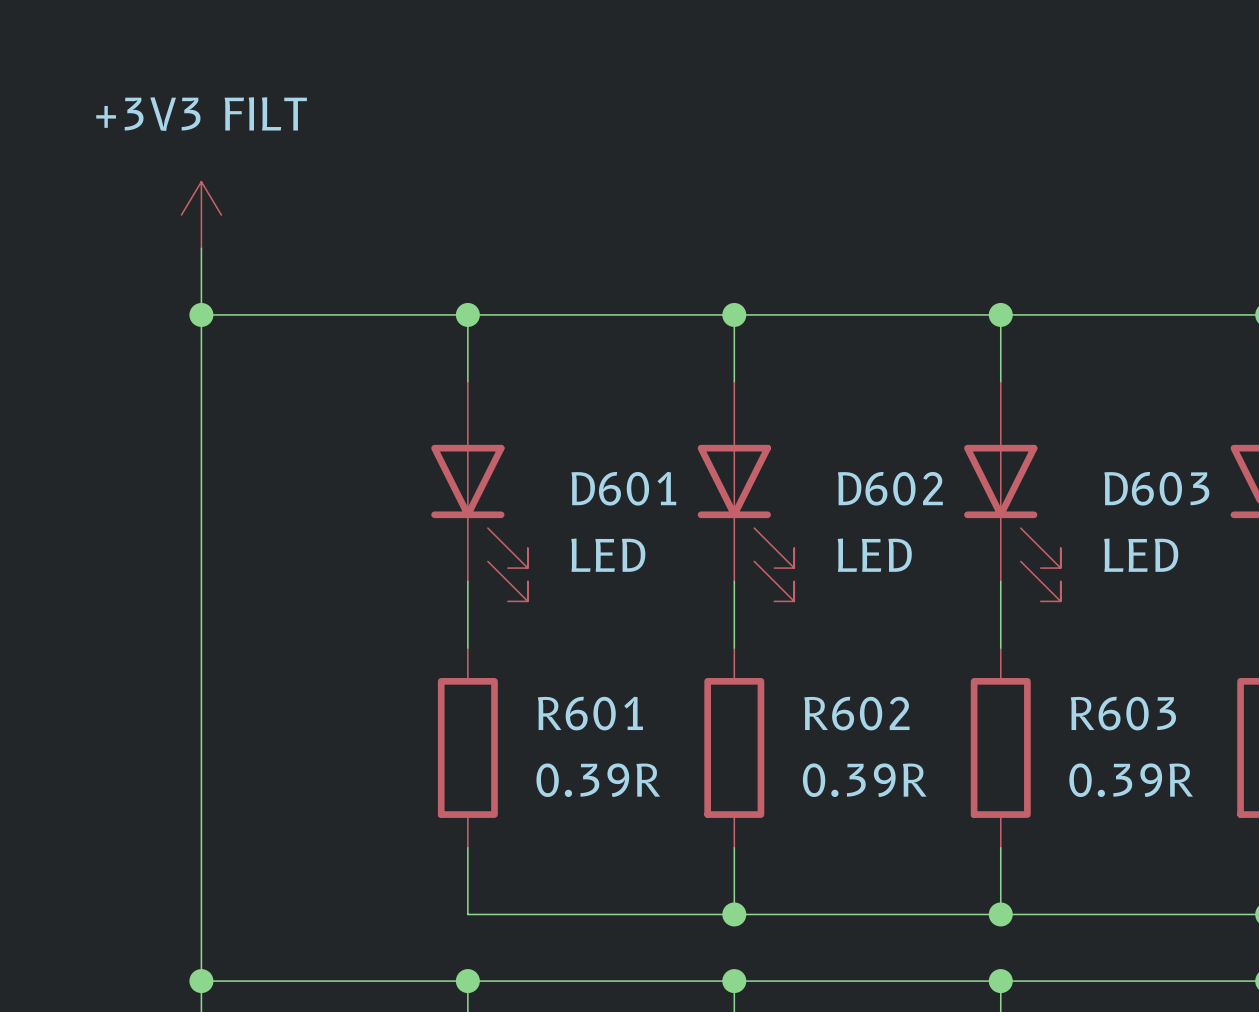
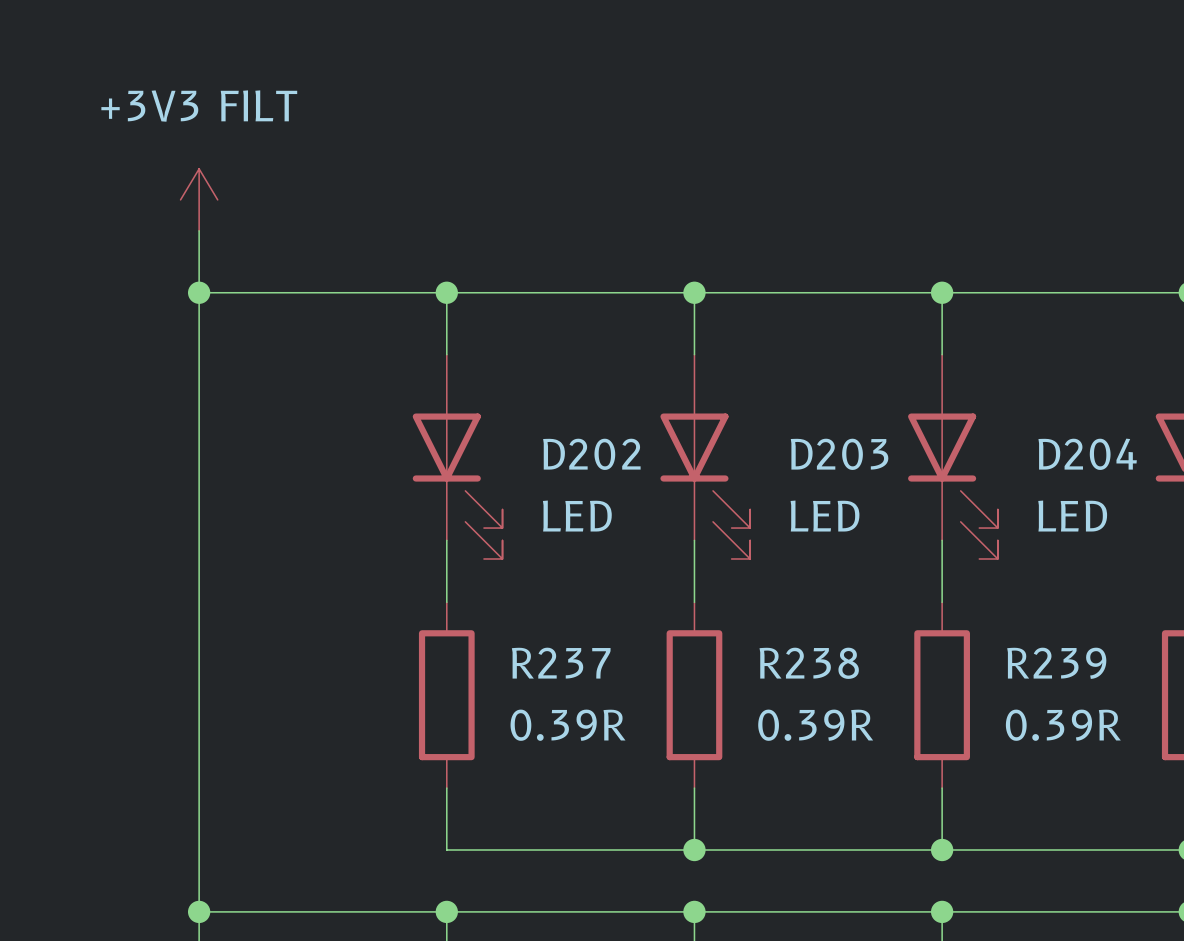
D601 name: D601 (623, 488) -> D202 (591, 454)
D602 name: D602 (890, 488) -> D203 (839, 454)
D603 name: D603 (1156, 488) -> D204 (1087, 454)
R601 name: R601 (590, 713) -> R237 (561, 663)
R602 name: R602 (856, 713) -> R238 (809, 663)
R603 name: R603 (1123, 713) -> R239 (1056, 663)

